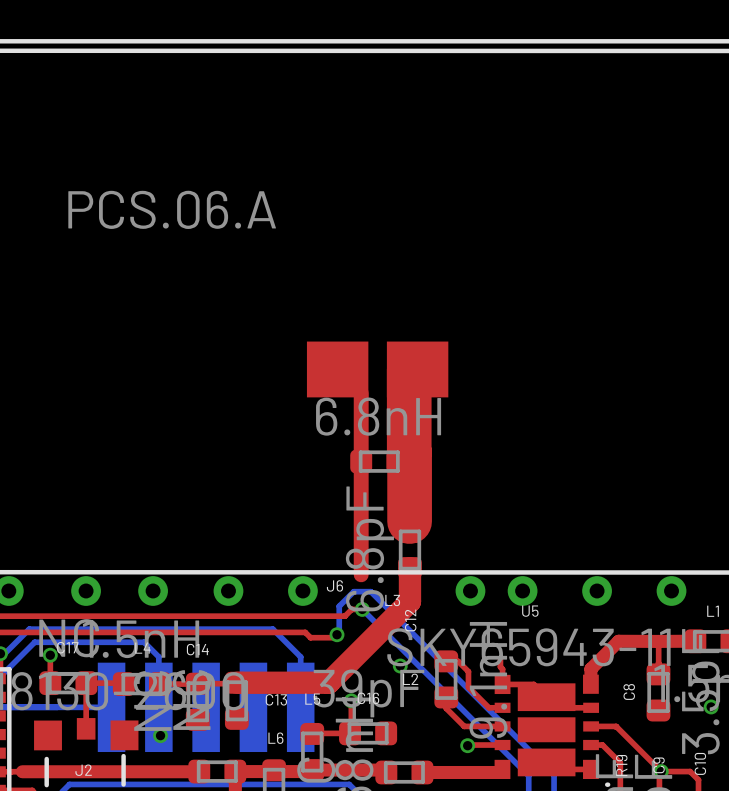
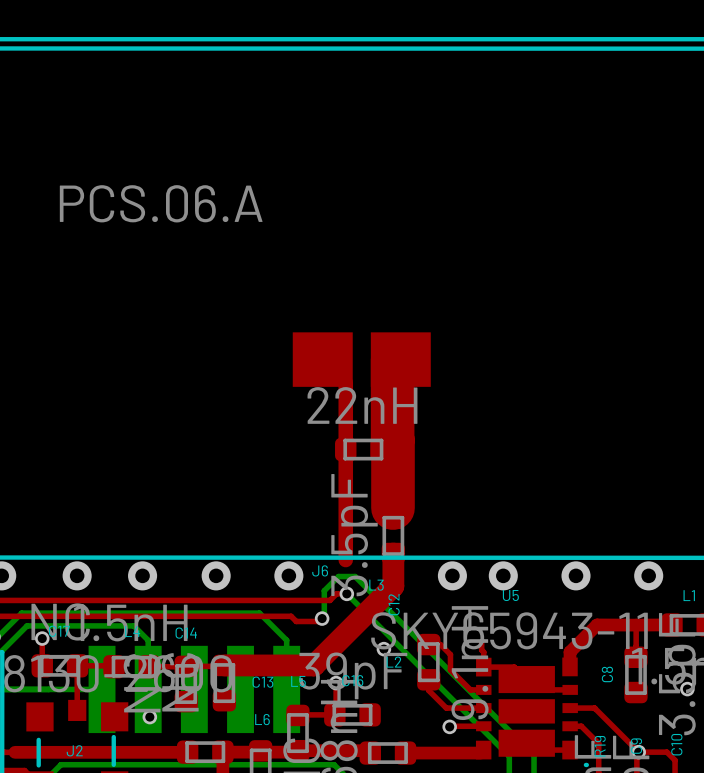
L3 value: 6.8nH (378, 416) -> 22nH (362, 405)
C12 value: 6.8pF (369, 548) -> 3.5pF (354, 535)

